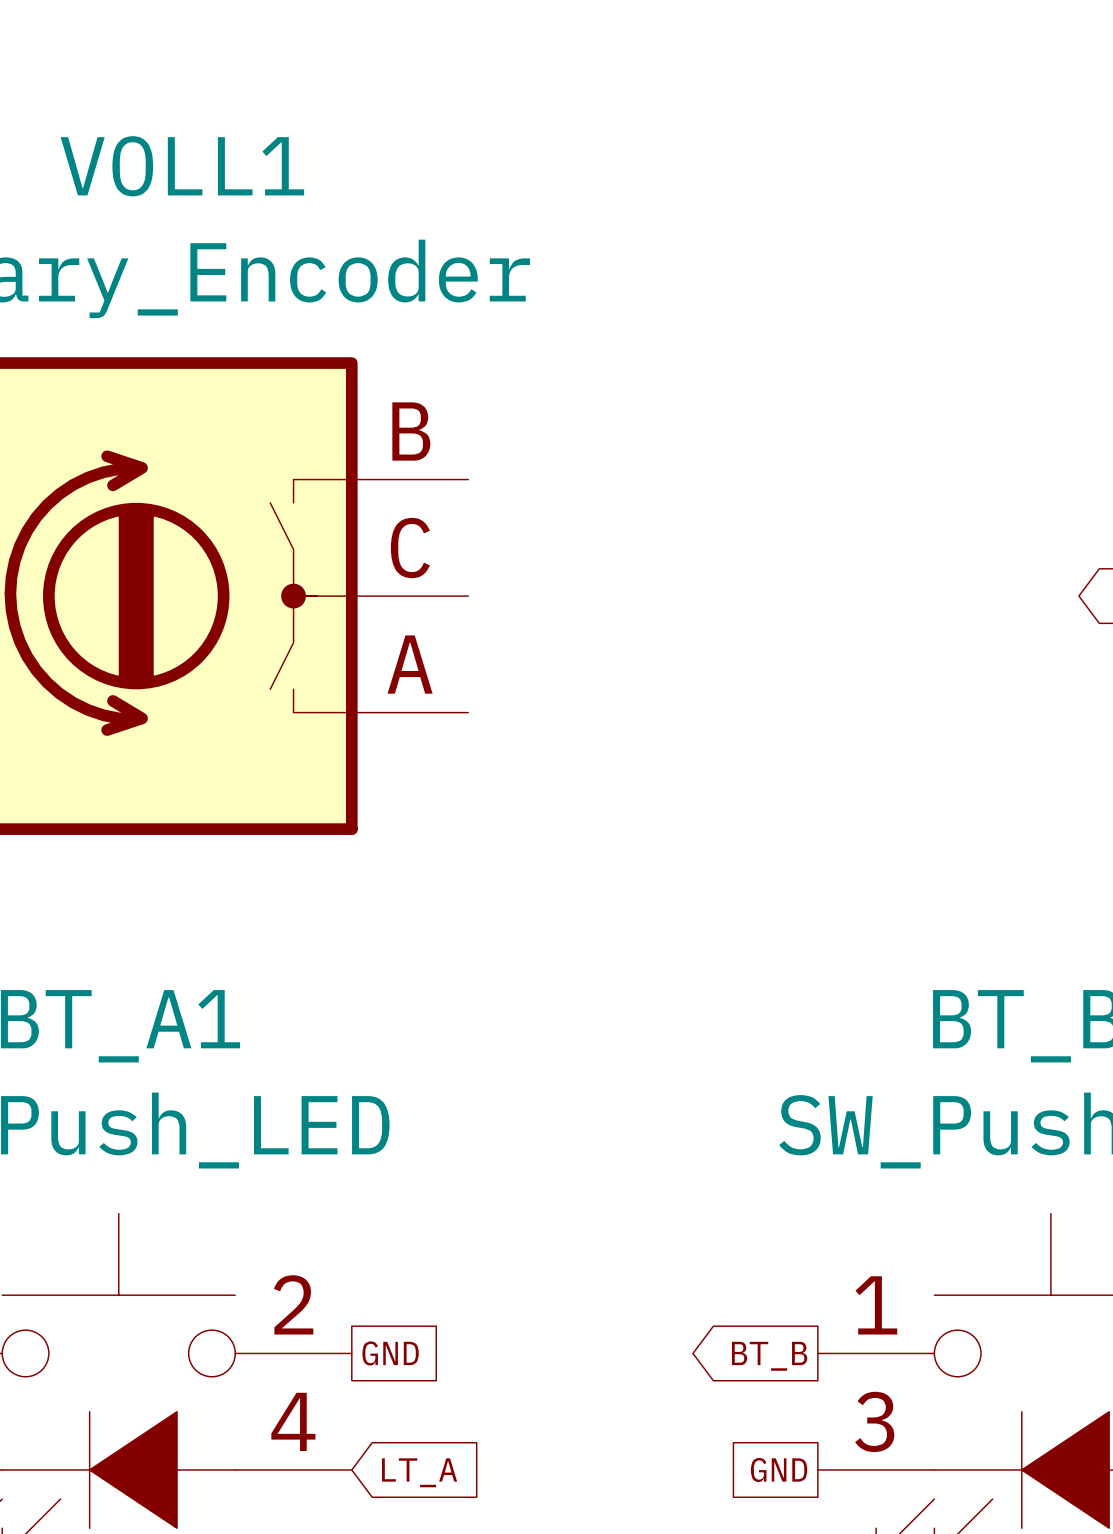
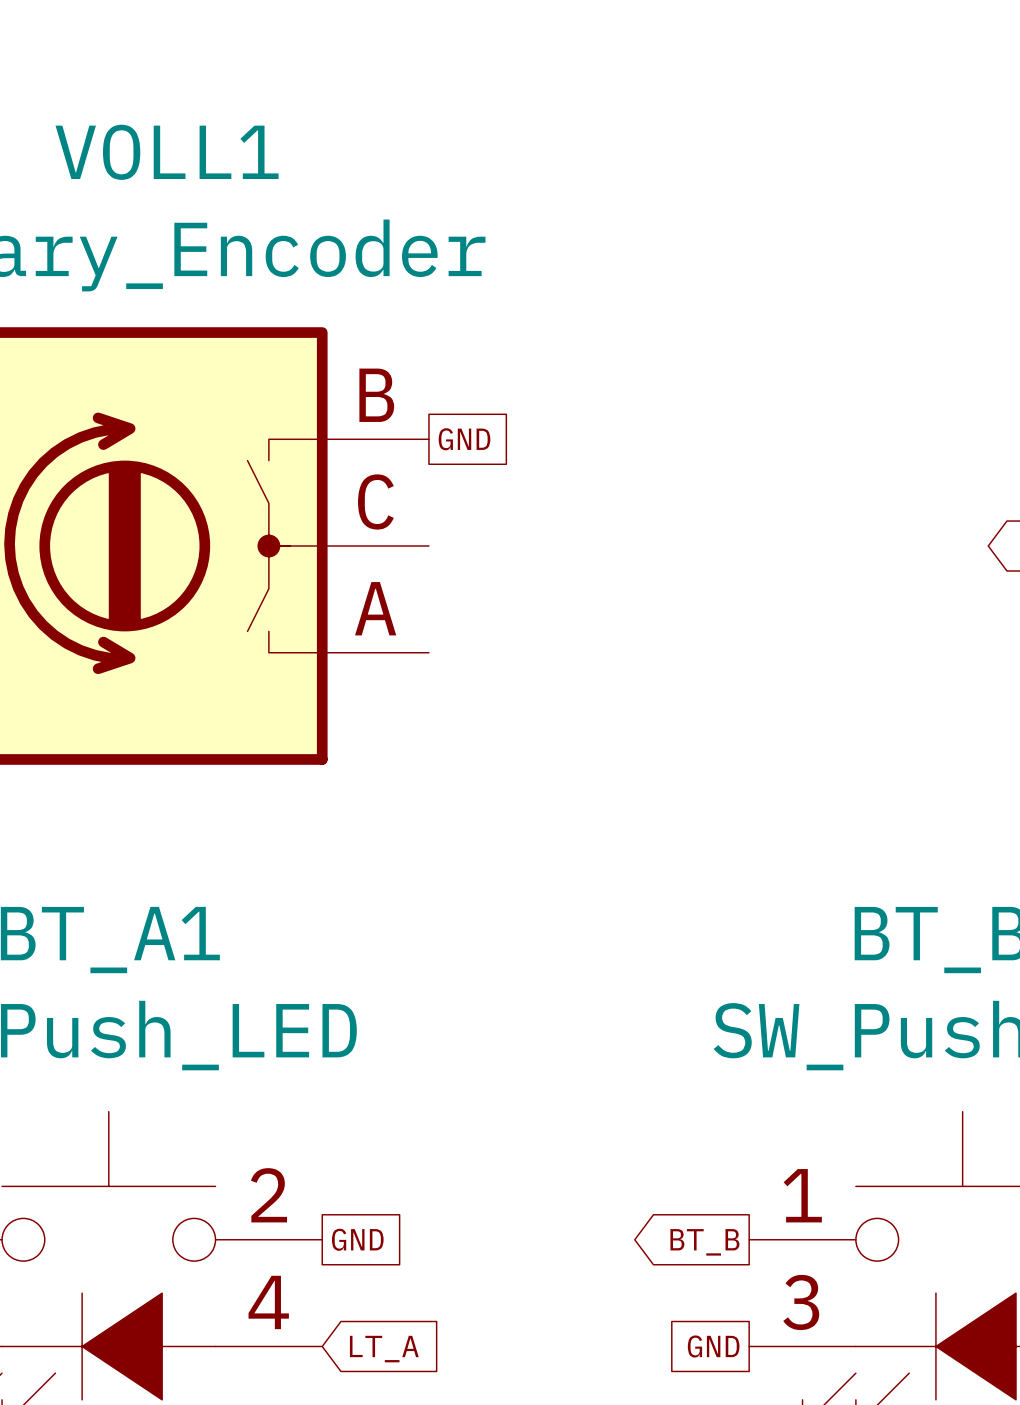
global label: none -> GND (464, 439)

